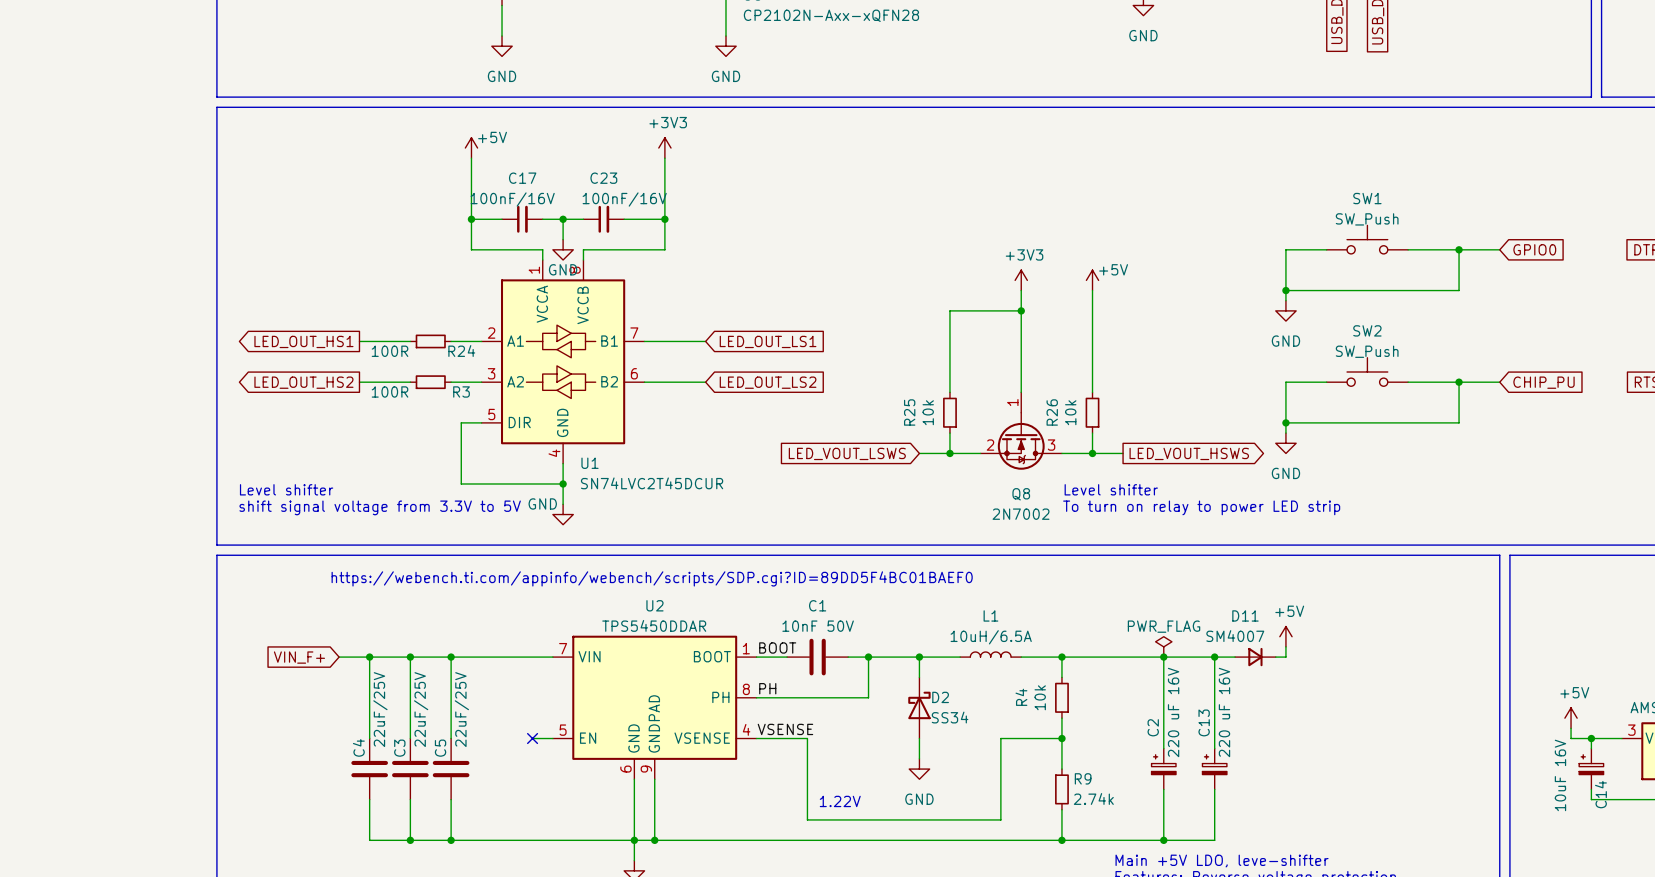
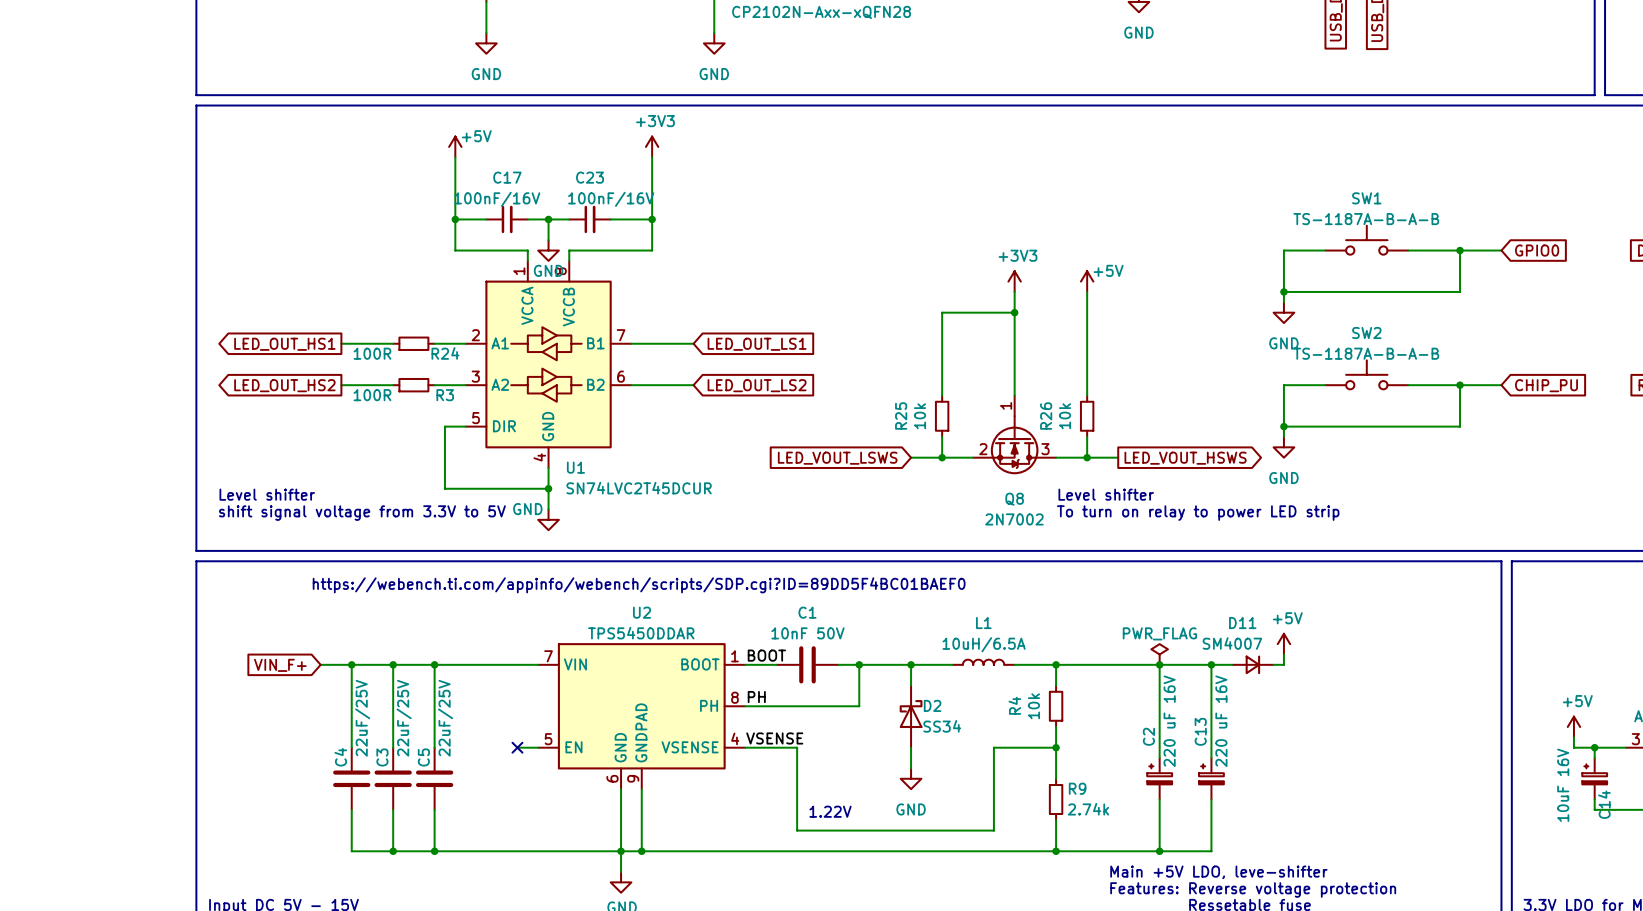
SW1 value: SW_Push (1367, 219) -> TS-1187A-B-A-B (1366, 219)
SW2 value: SW_Push (1367, 351) -> TS-1187A-B-A-B (1366, 353)

